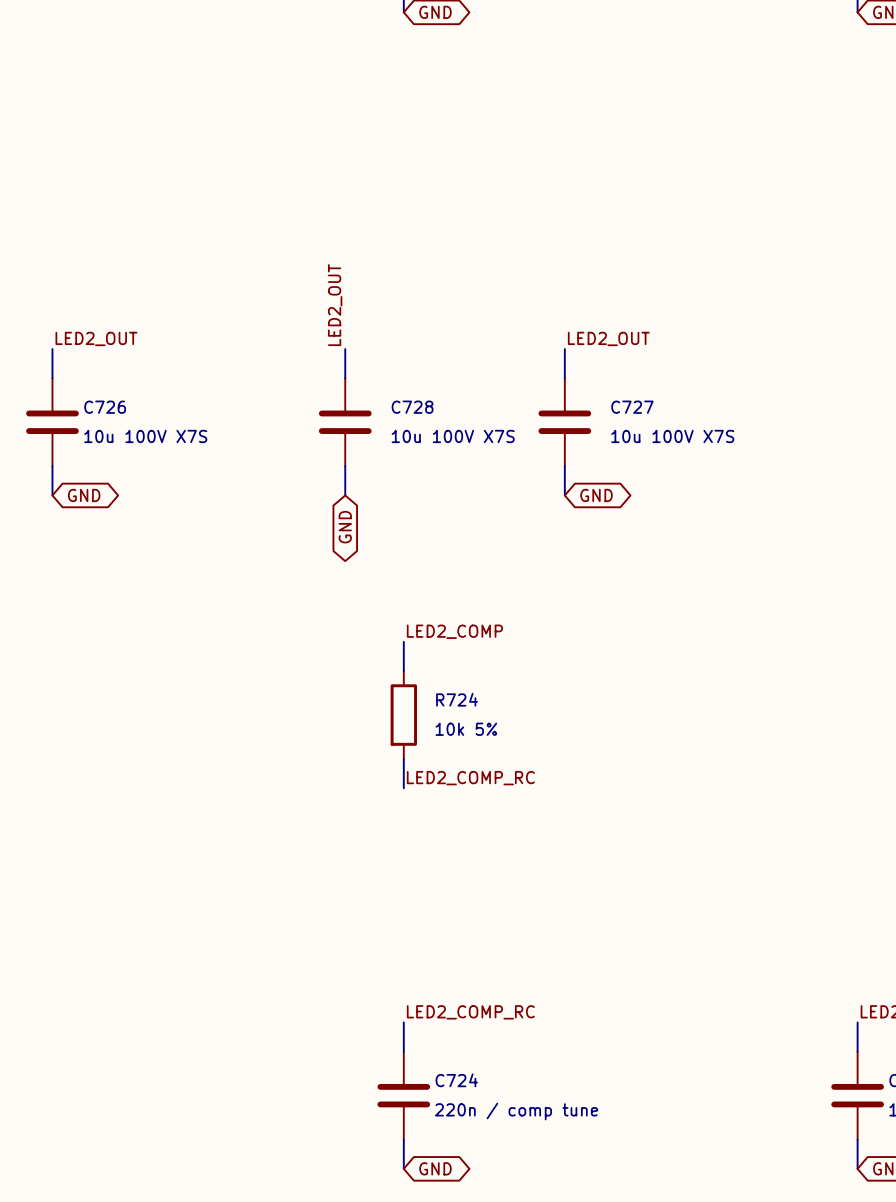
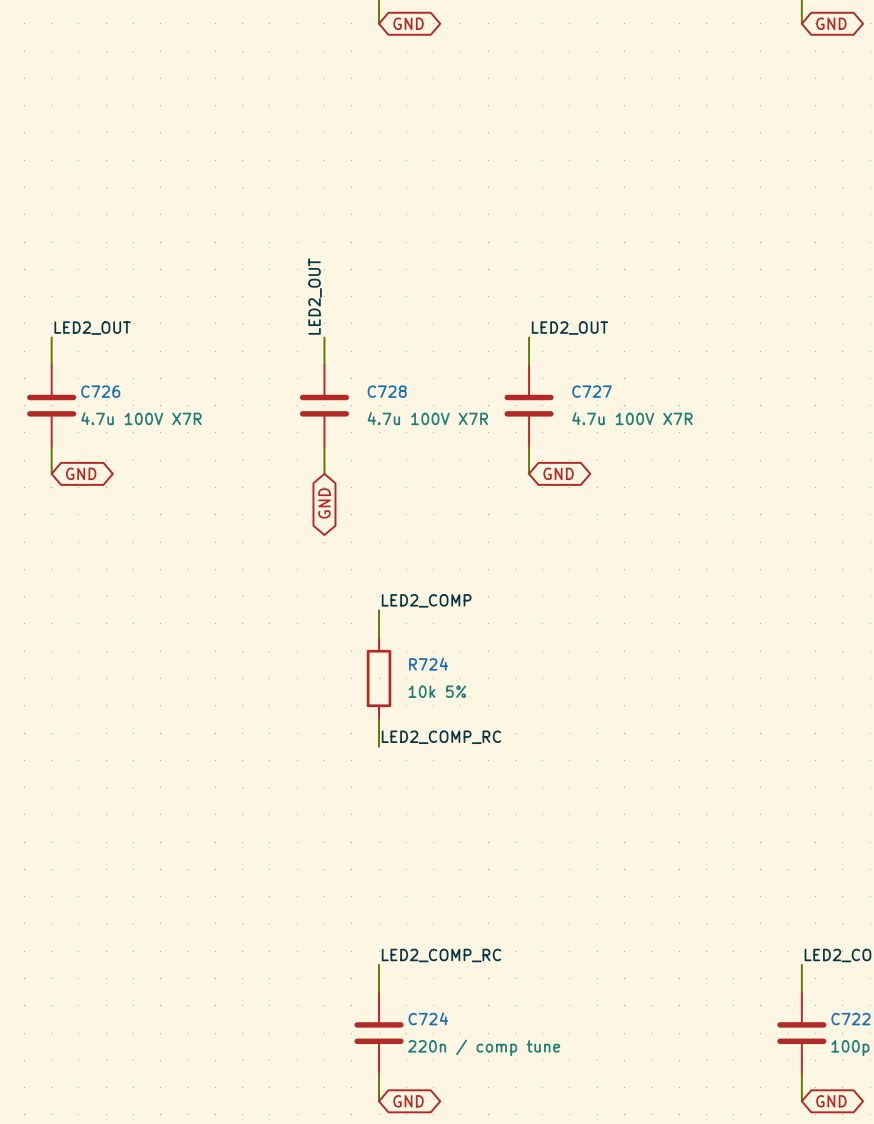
C726 value: 10u 100V X7S (145, 436) -> 4.7u 100V X7R (141, 418)
C728 value: 10u 100V X7S (453, 436) -> 4.7u 100V X7R (427, 418)
C727 value: 10u 100V X7S (672, 436) -> 4.7u 100V X7R (632, 418)

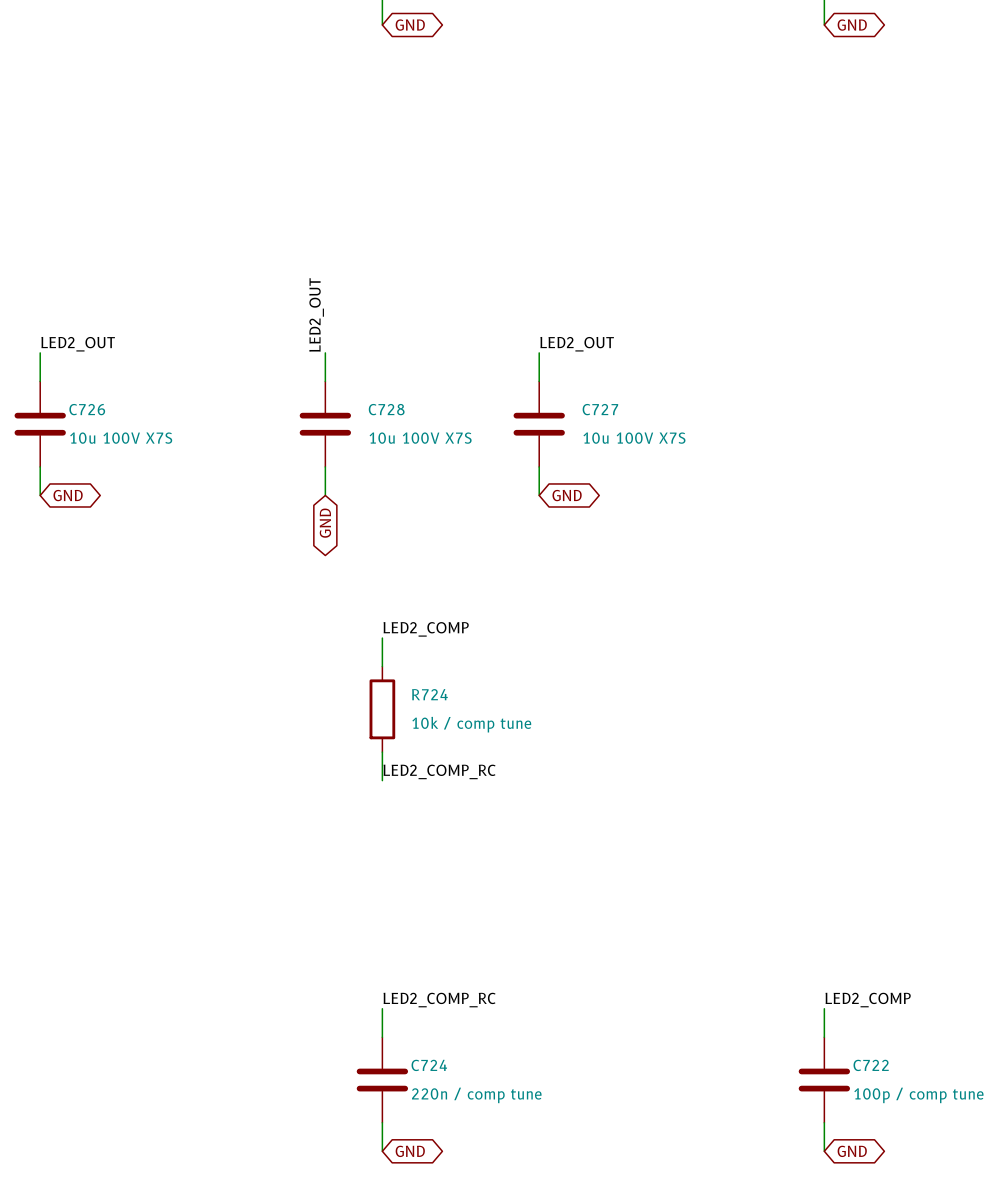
C726 value: 4.7u 100V X7R (141, 418) -> 10u 100V X7S (121, 438)
C728 value: 4.7u 100V X7R (427, 418) -> 10u 100V X7S (420, 438)
C727 value: 4.7u 100V X7R (632, 418) -> 10u 100V X7S (634, 438)
R724 value: 10k 5% (437, 691) -> 10k / comp tune (471, 724)

